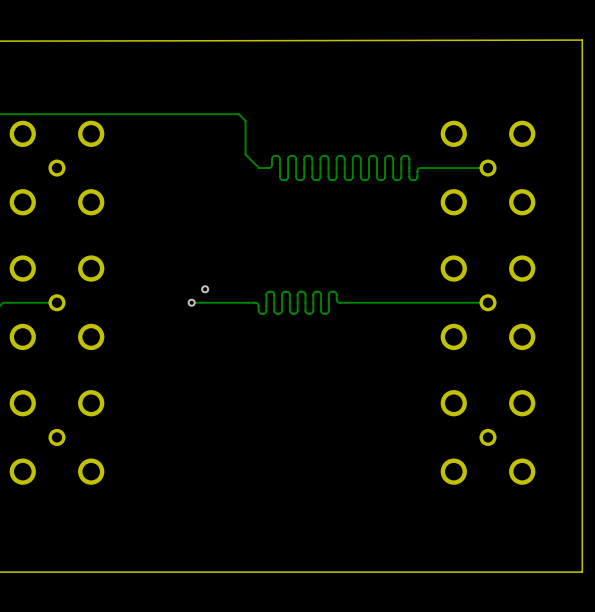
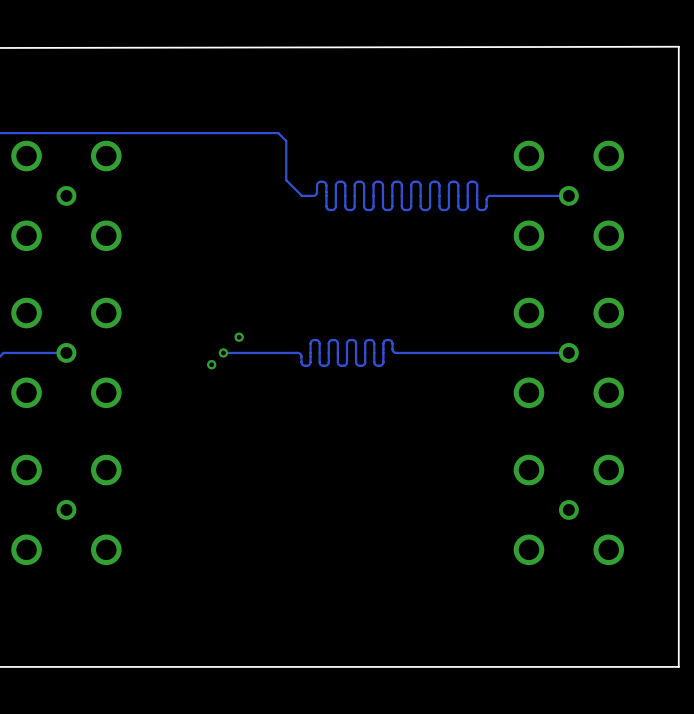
via: none -> (211, 364)

